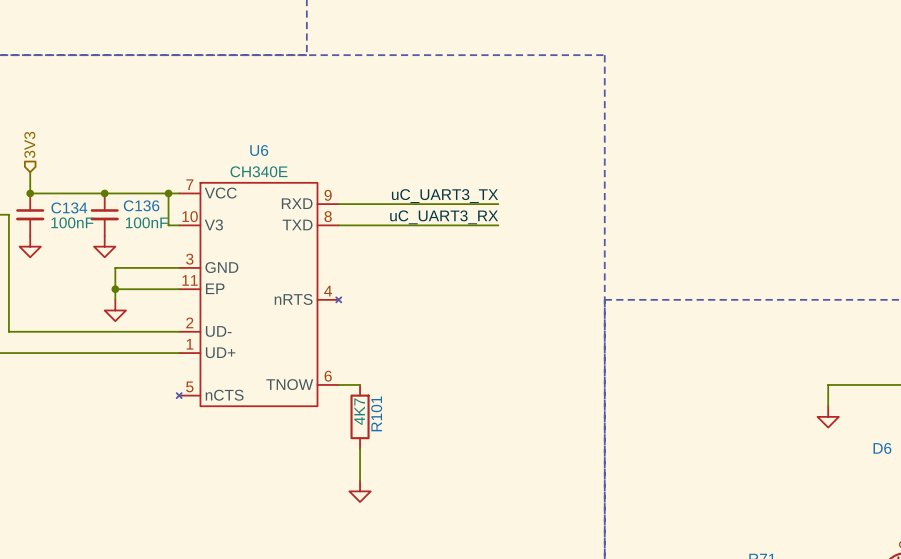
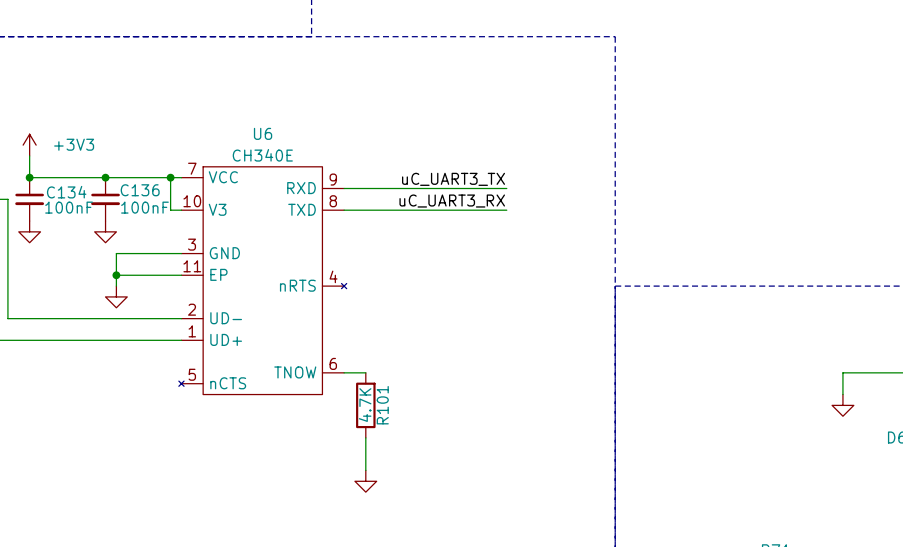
hierarchical label: 3V3 (29, 144) -> none
power symbol: none -> +3V3 (29, 145)
R101 value: 4K7 (359, 411) -> 4.7K (365, 405)

